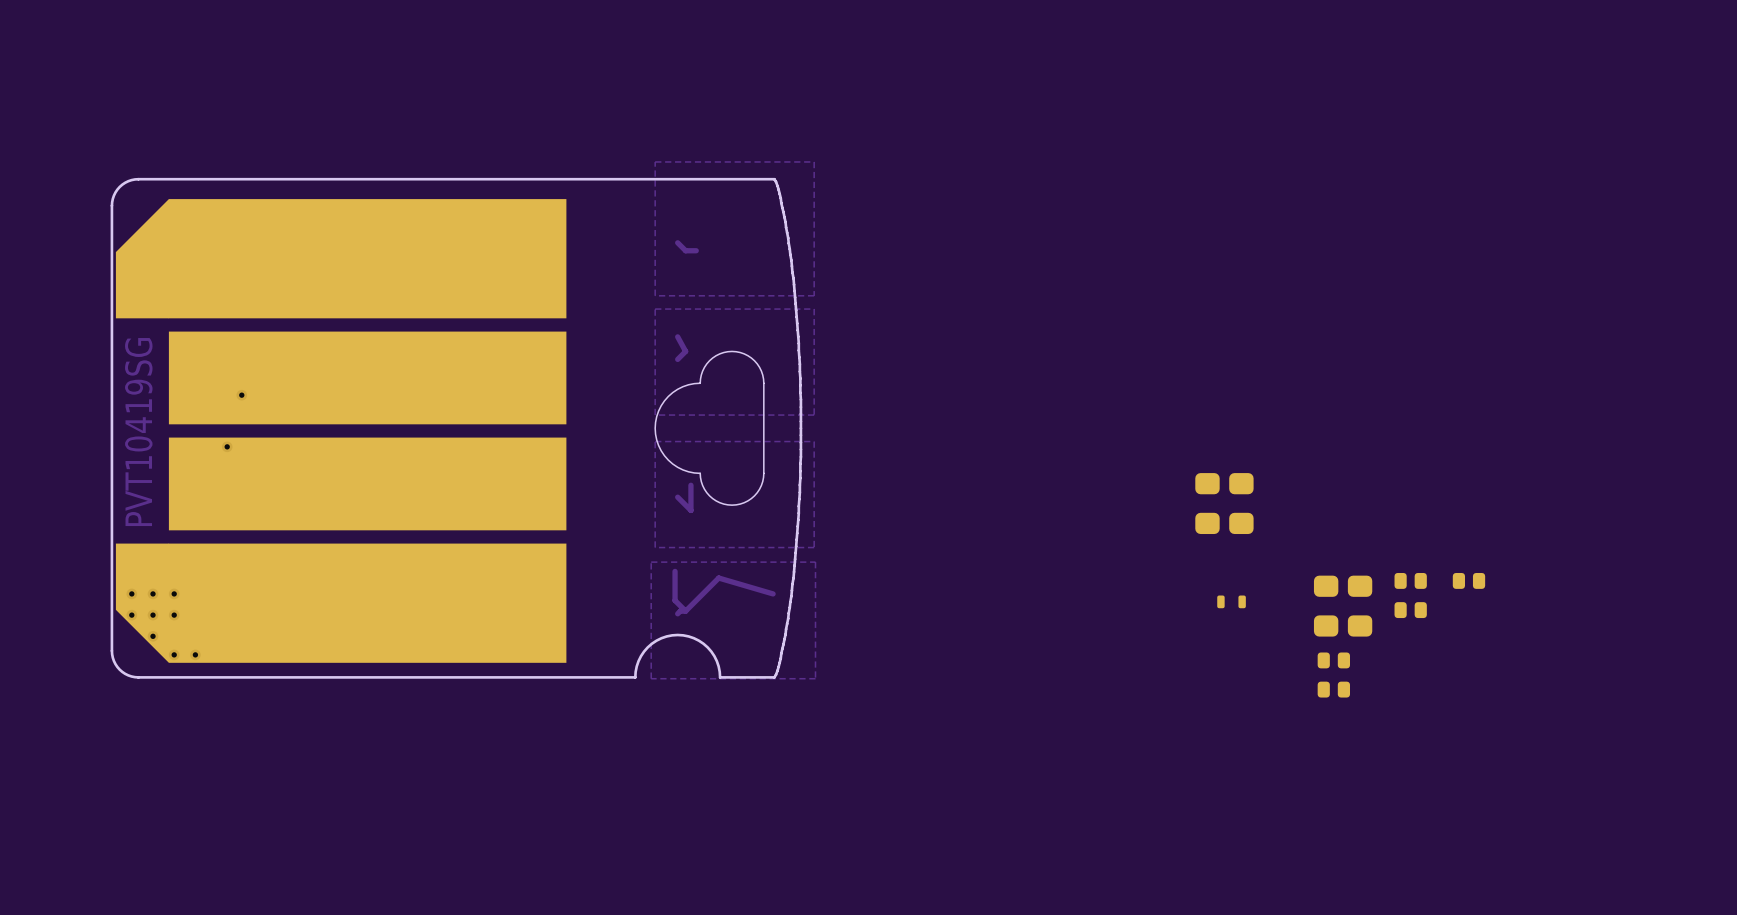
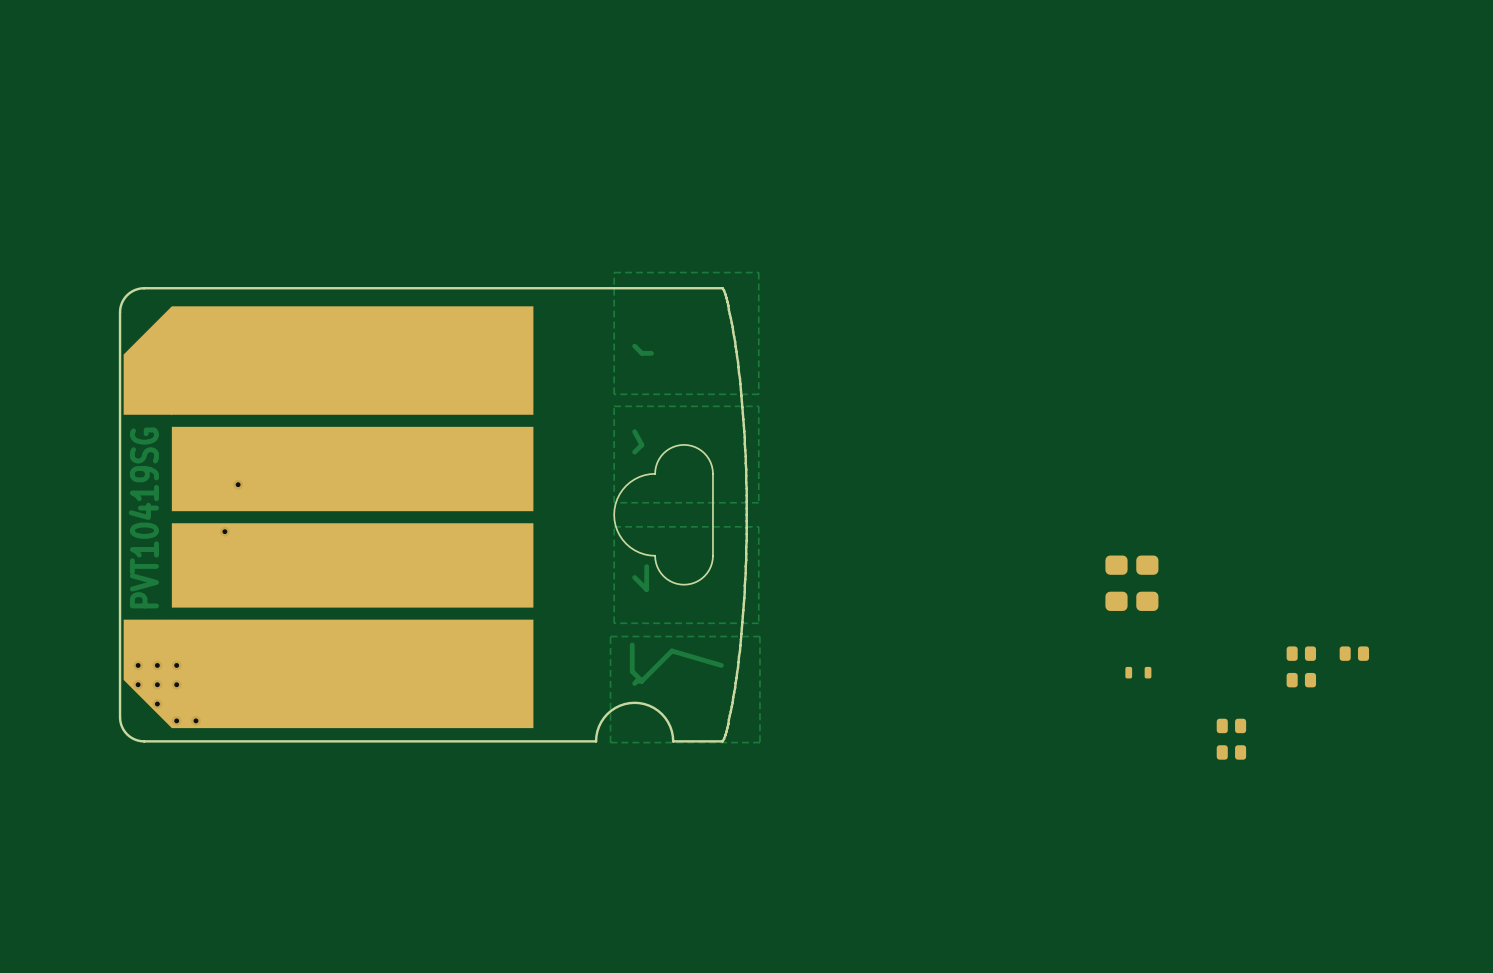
part: (1343, 586) -> none
part: (1343, 625) -> none

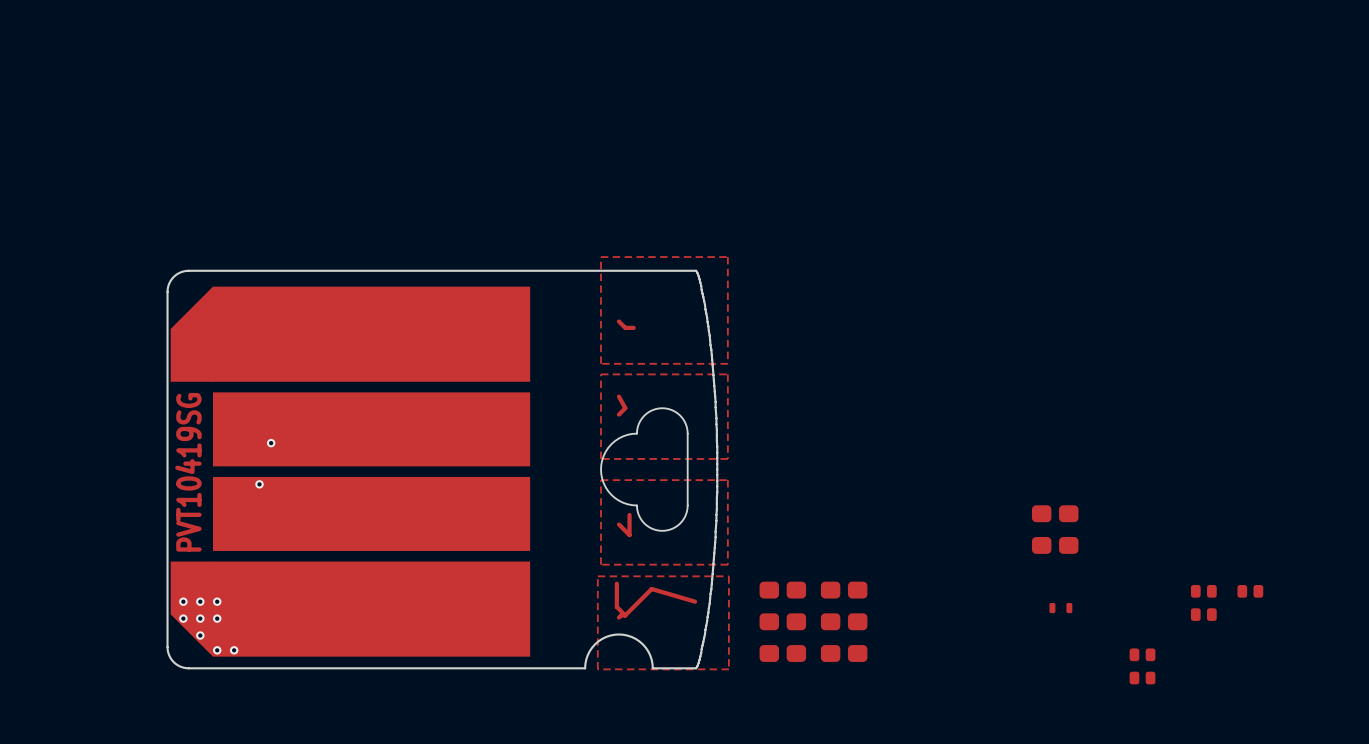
part: none -> (782, 590)
part: none -> (844, 590)
part: none -> (782, 621)
part: none -> (844, 621)
part: none -> (782, 653)
part: none -> (844, 653)

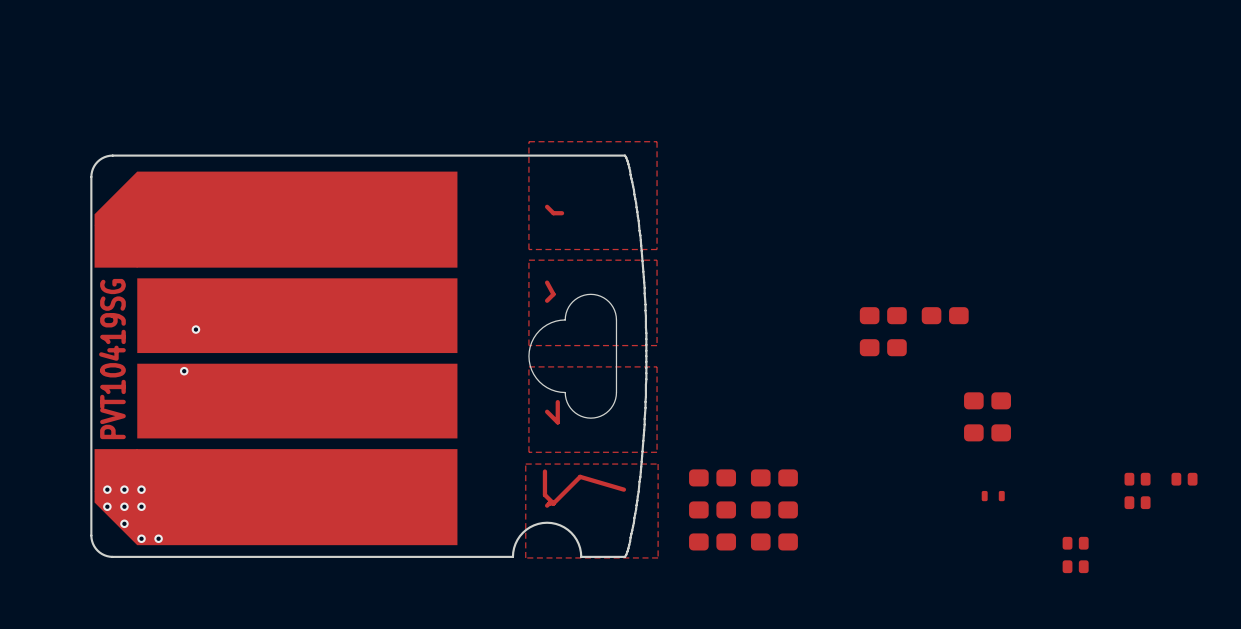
part: none -> (883, 315)
part: none -> (945, 315)
part: none -> (883, 347)

